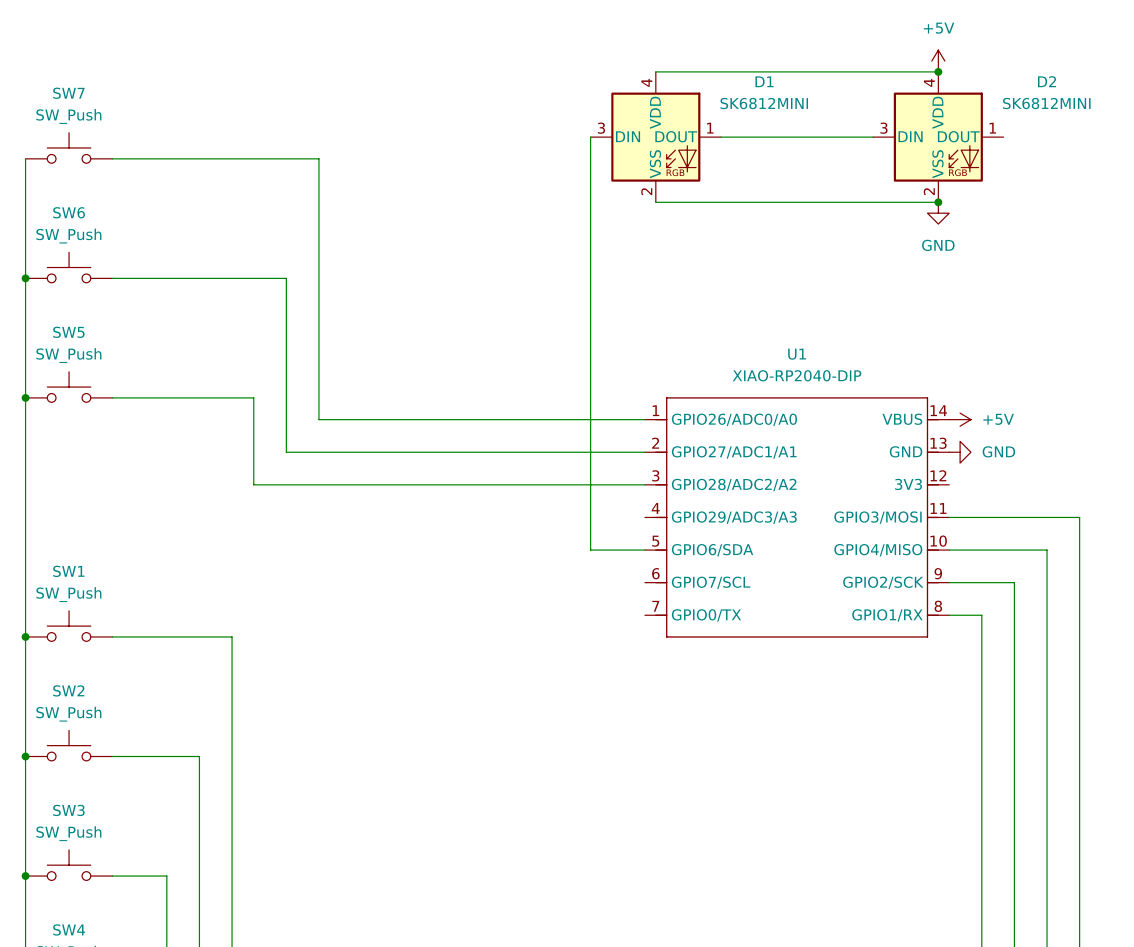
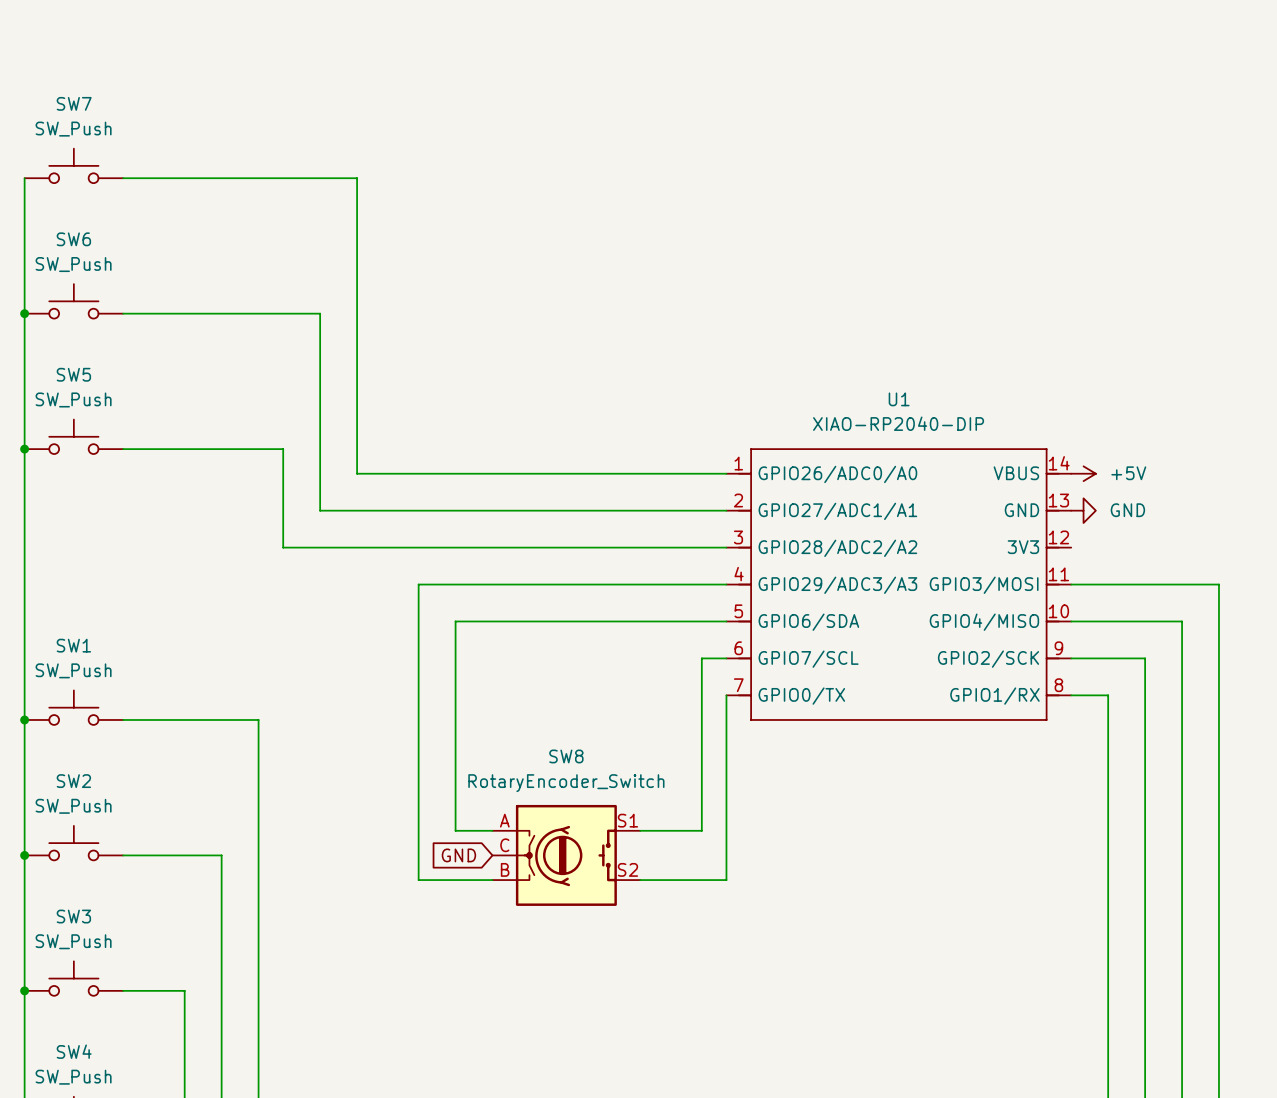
power symbol: +5V (938, 61) -> none
wire: (655, 71) (938, 71) -> none
junction: (938, 71) -> none
wire: (590, 137) (590, 550) -> (492, 830) (455, 830) (455, 621) (664, 621)
D1: SK6812MINI (655, 137) -> none
wire: (721, 137) (873, 137) -> none
D2: SK6812MINI (938, 137) -> none
wire: (655, 202) (938, 202) -> none
junction: (938, 202) -> none
power symbol: GND (938, 213) -> none
wire: none -> (726, 584) (418, 584) (418, 880) (492, 880)
wire: none -> (726, 658) (701, 658) (701, 830) (640, 830)
wire: none -> (726, 695) (726, 880) (640, 880)
global label: none -> GND (458, 855)
SW8: none -> RotaryEncoder_Switch (566, 855)

